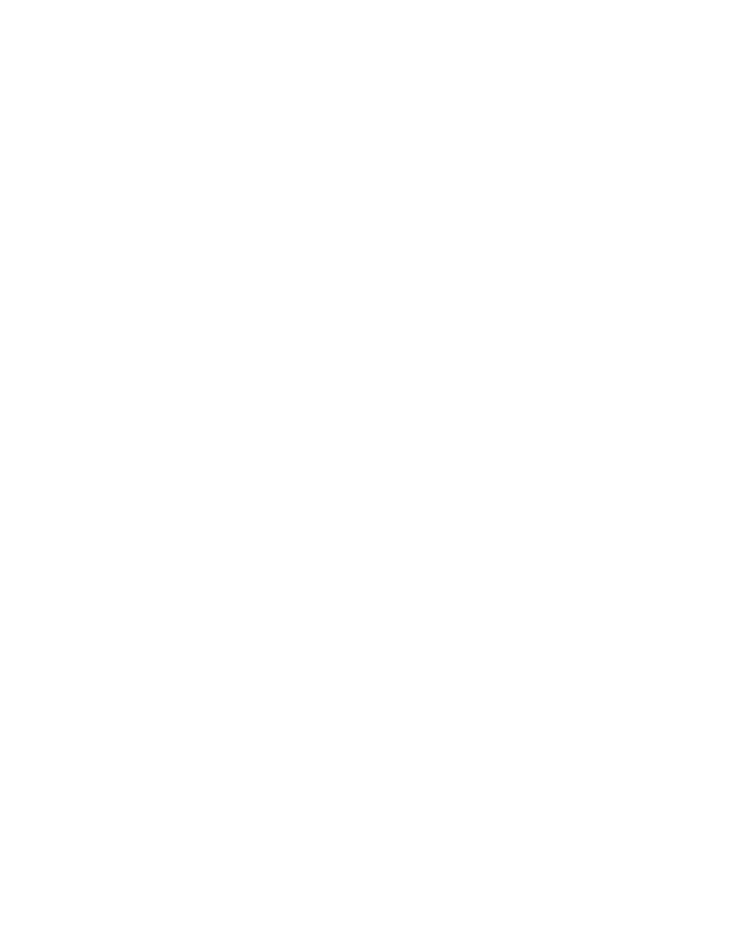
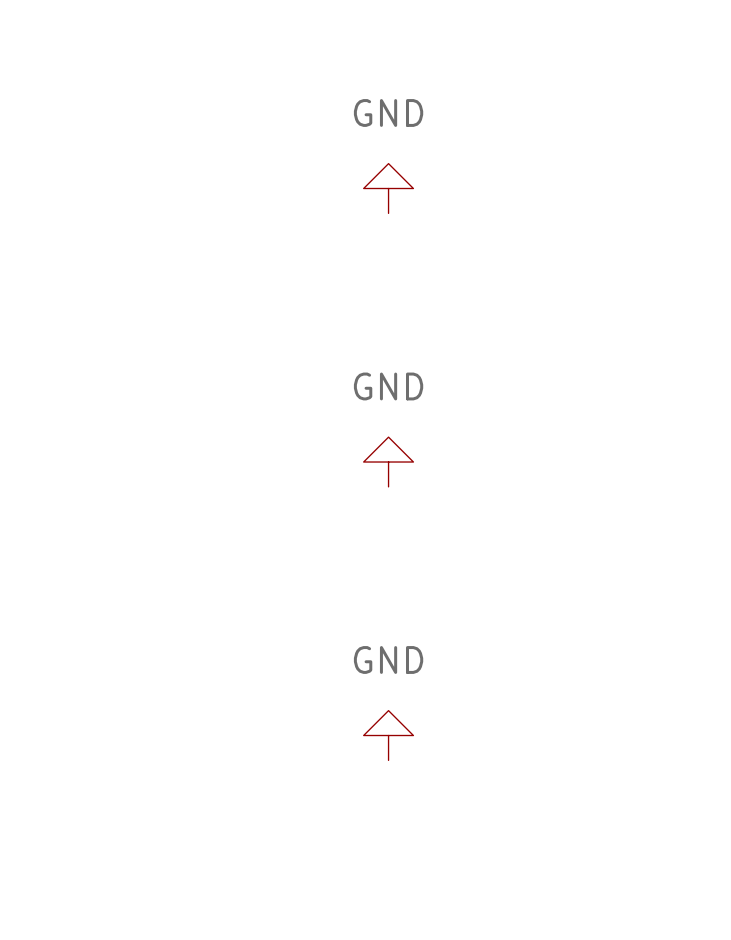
power symbol: none -> GND (388, 188)
power symbol: none -> GND (388, 462)
power symbol: none -> GND (388, 735)

